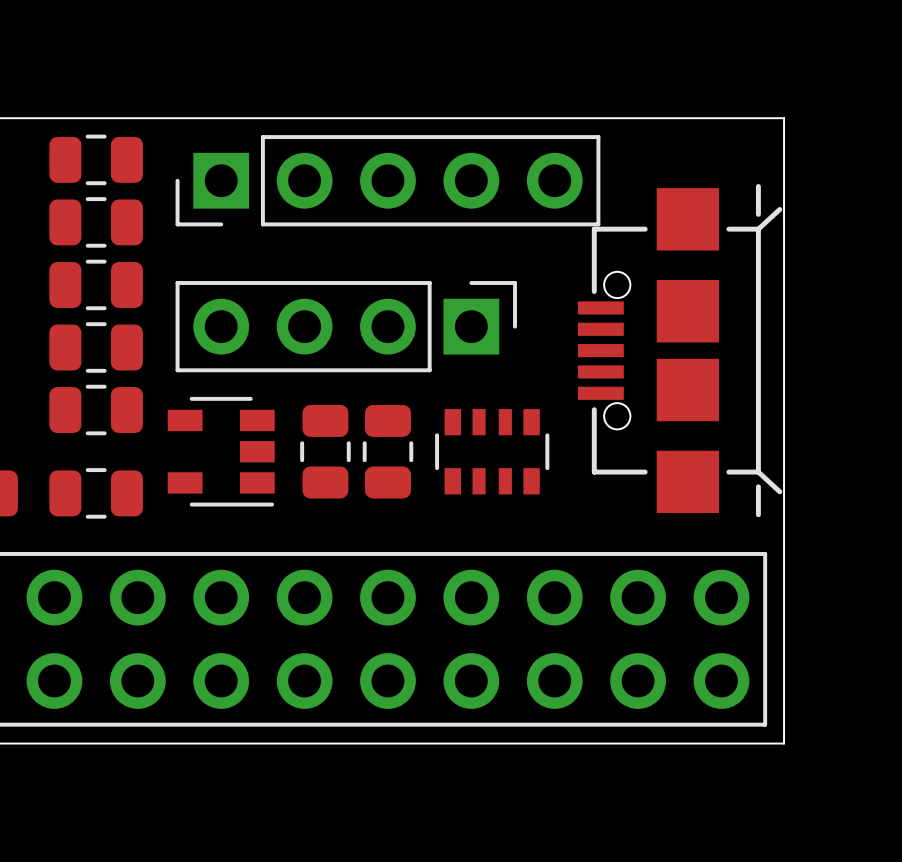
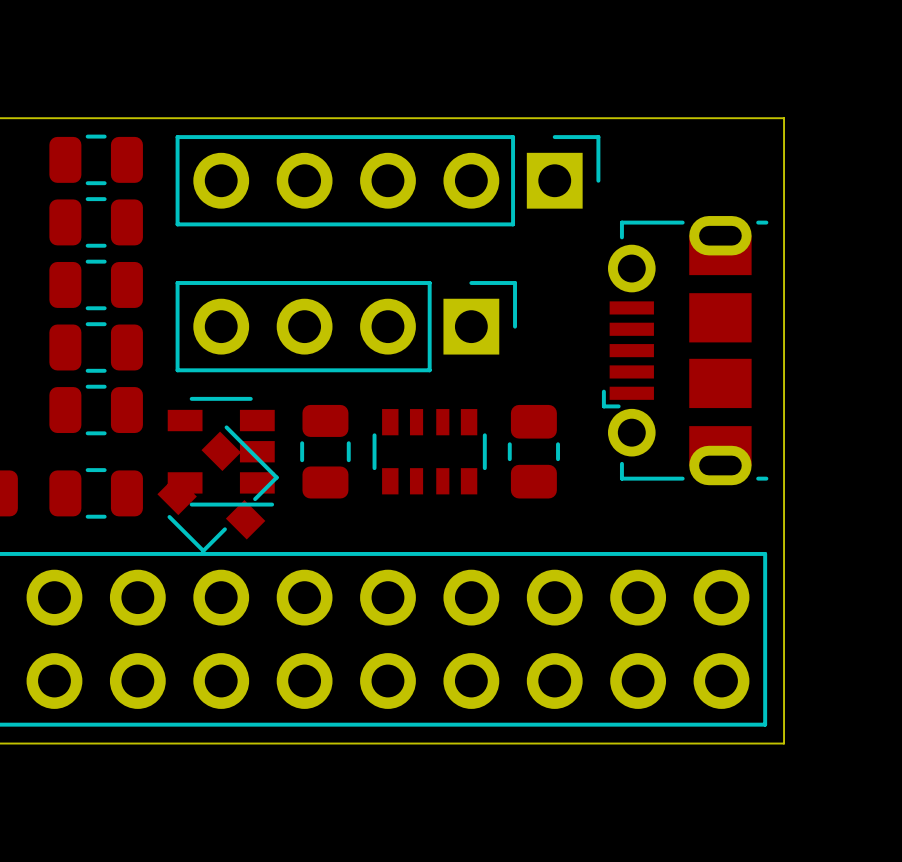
part rotation: 0° (387, 180) -> 180° (387, 180)
part footprint: [577, 184, 783, 518] -> [601, 216, 769, 486]
part: (387, 451) -> none
part position: (492, 451) -> (429, 451)
part: none -> (533, 451)
part: none -> (218, 489)

